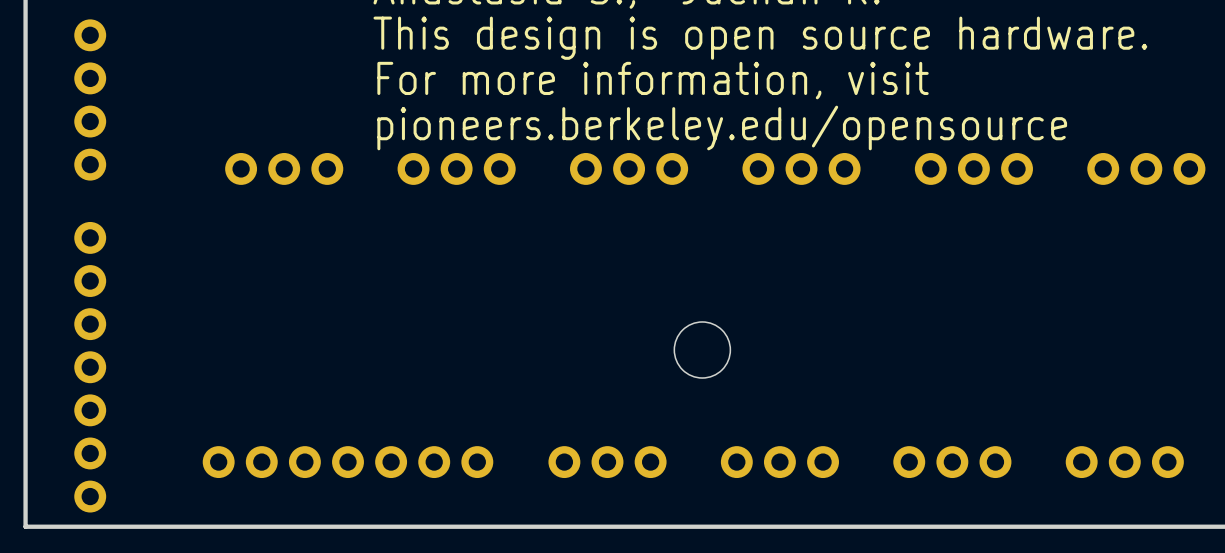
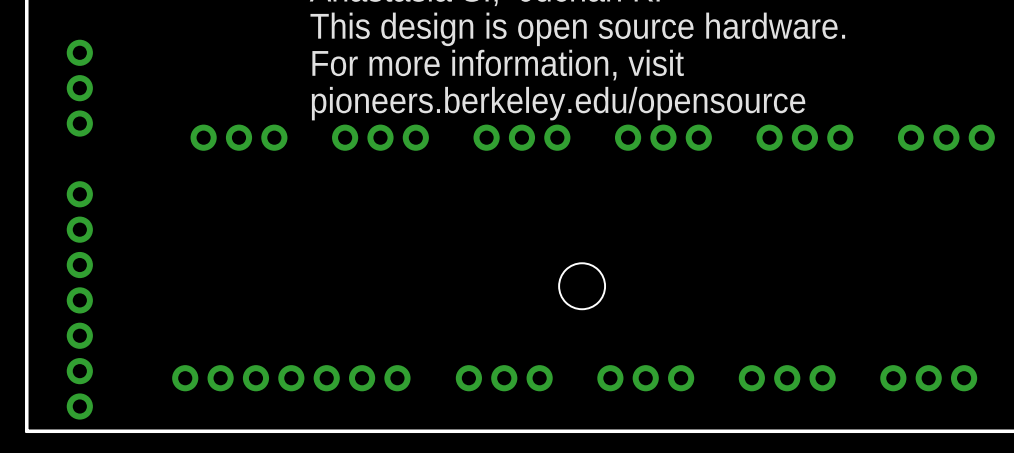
part footprint: [74, 19, 107, 181] -> [66, 39, 93, 137]

